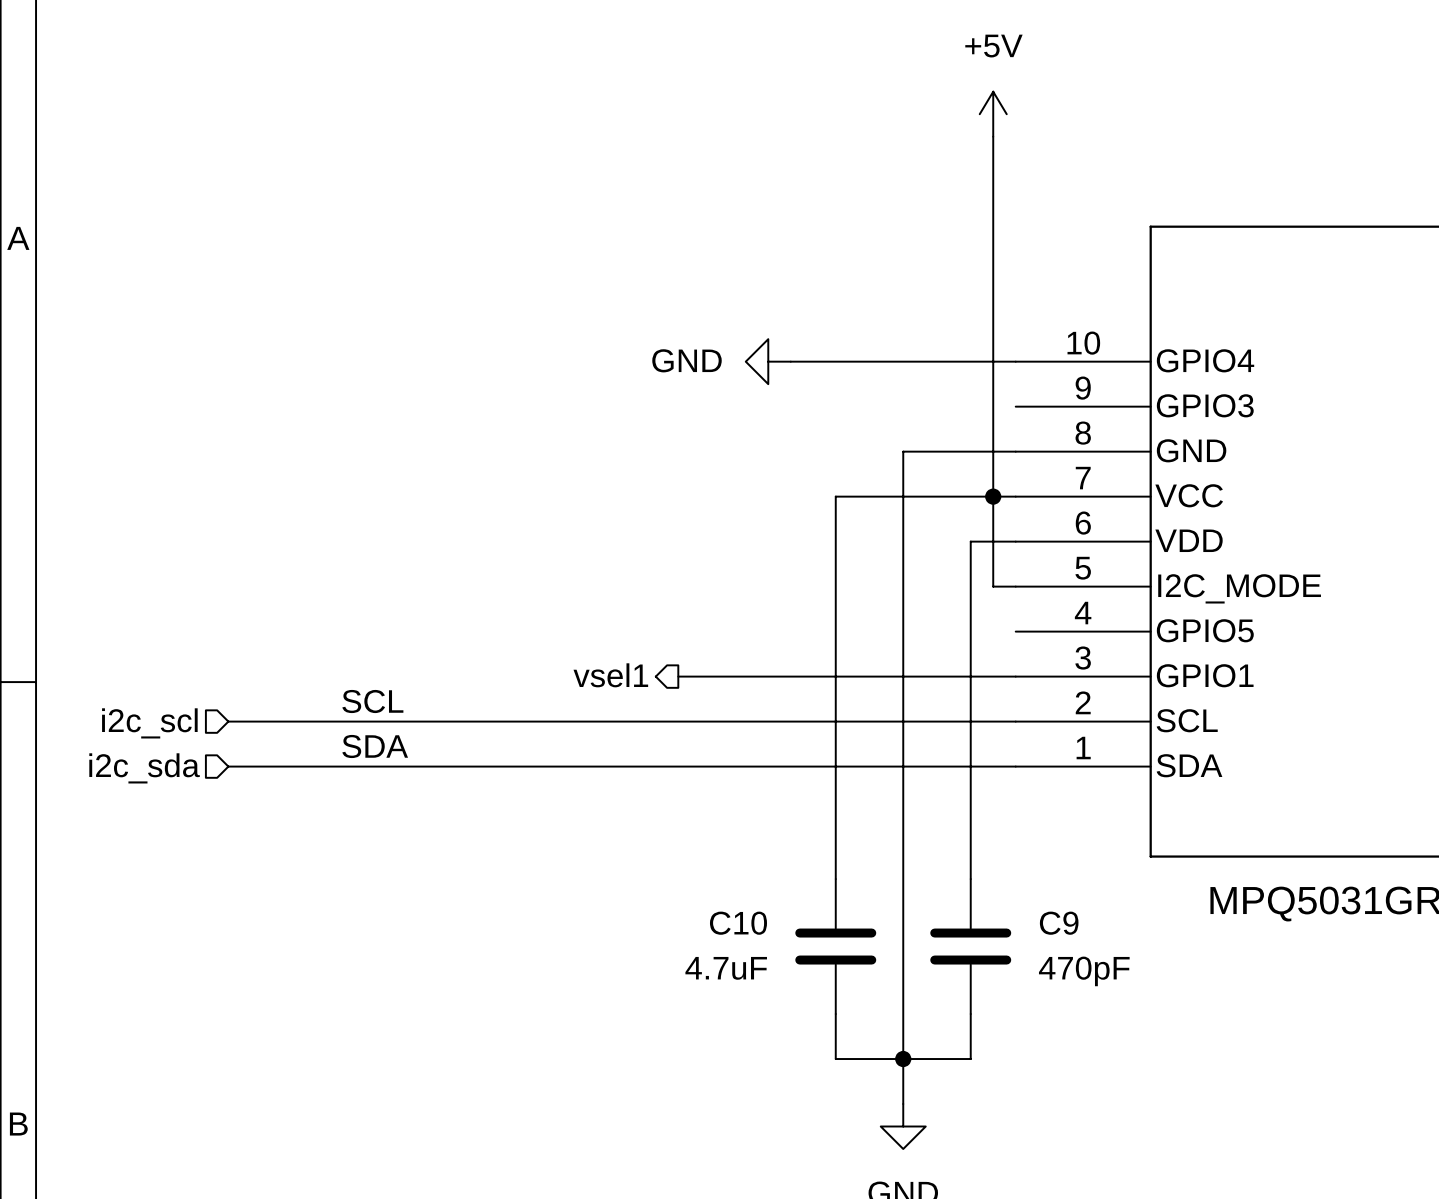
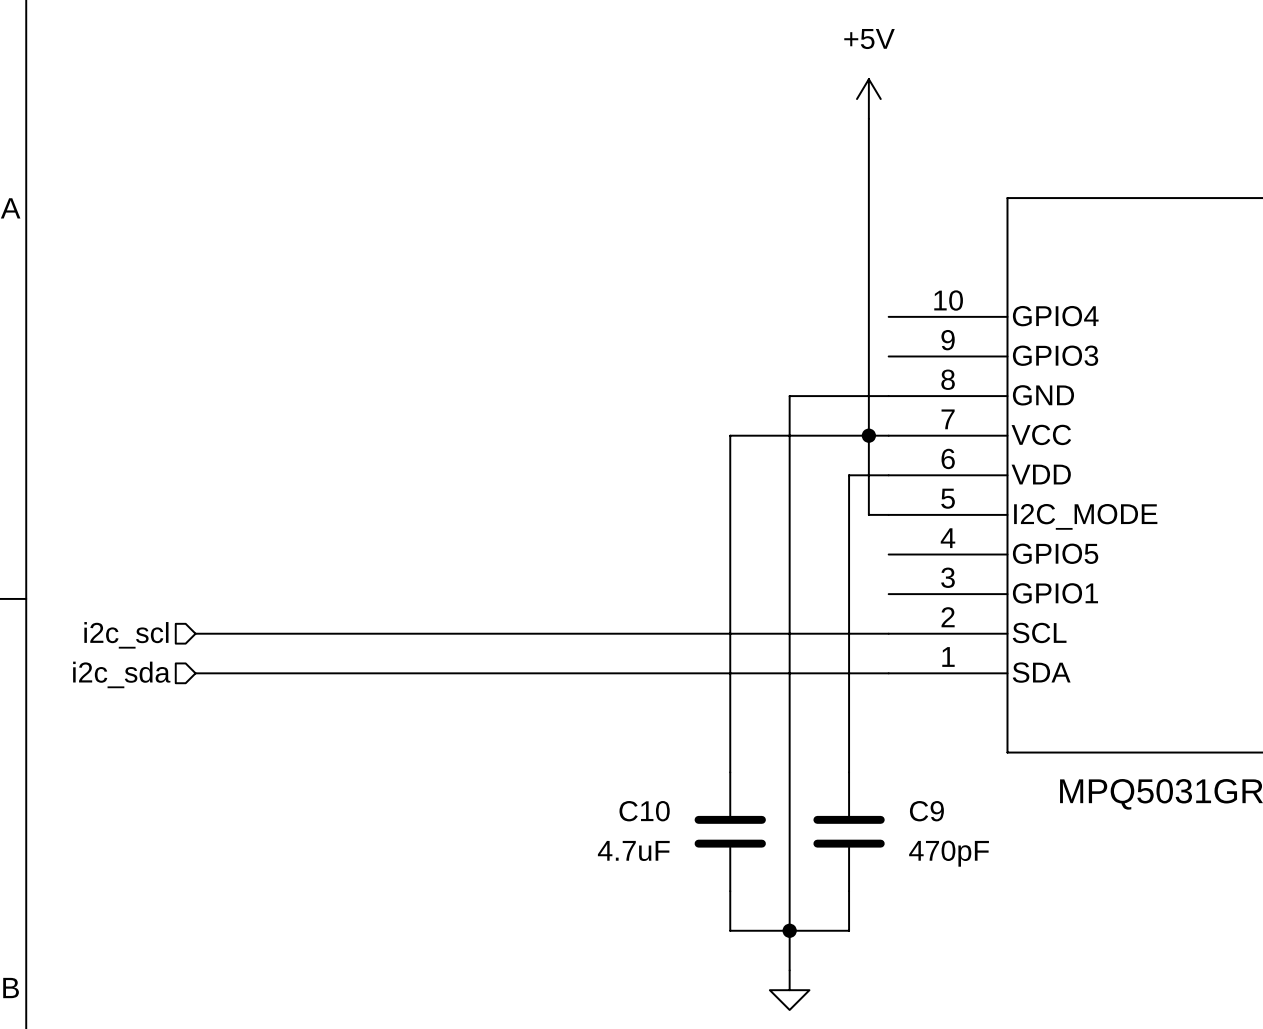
power symbol: GND (768, 361) -> none
wire: (790, 361) (1015, 361) -> none
hierarchical label: vsel1 (610, 675) -> none
wire: (678, 676) (1015, 676) -> none
label: SCL (372, 701) -> none
label: SDA (375, 746) -> none

